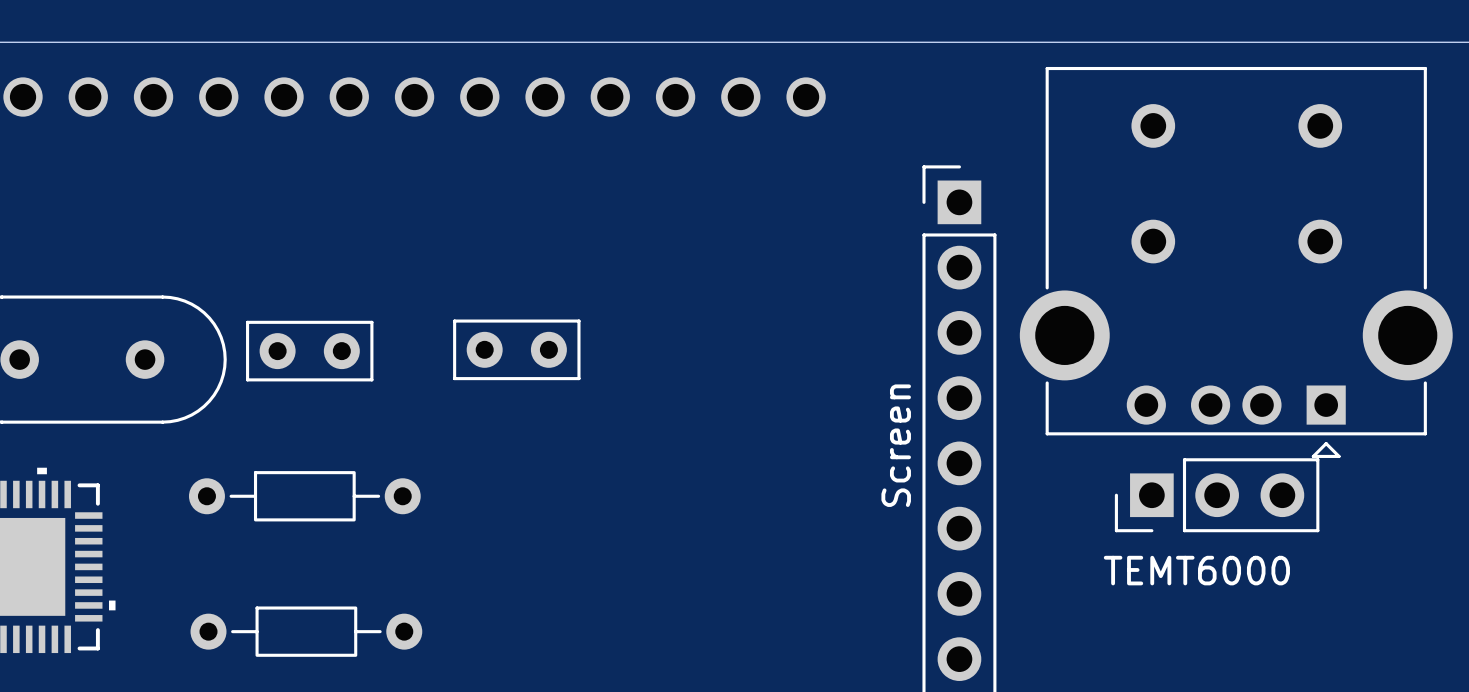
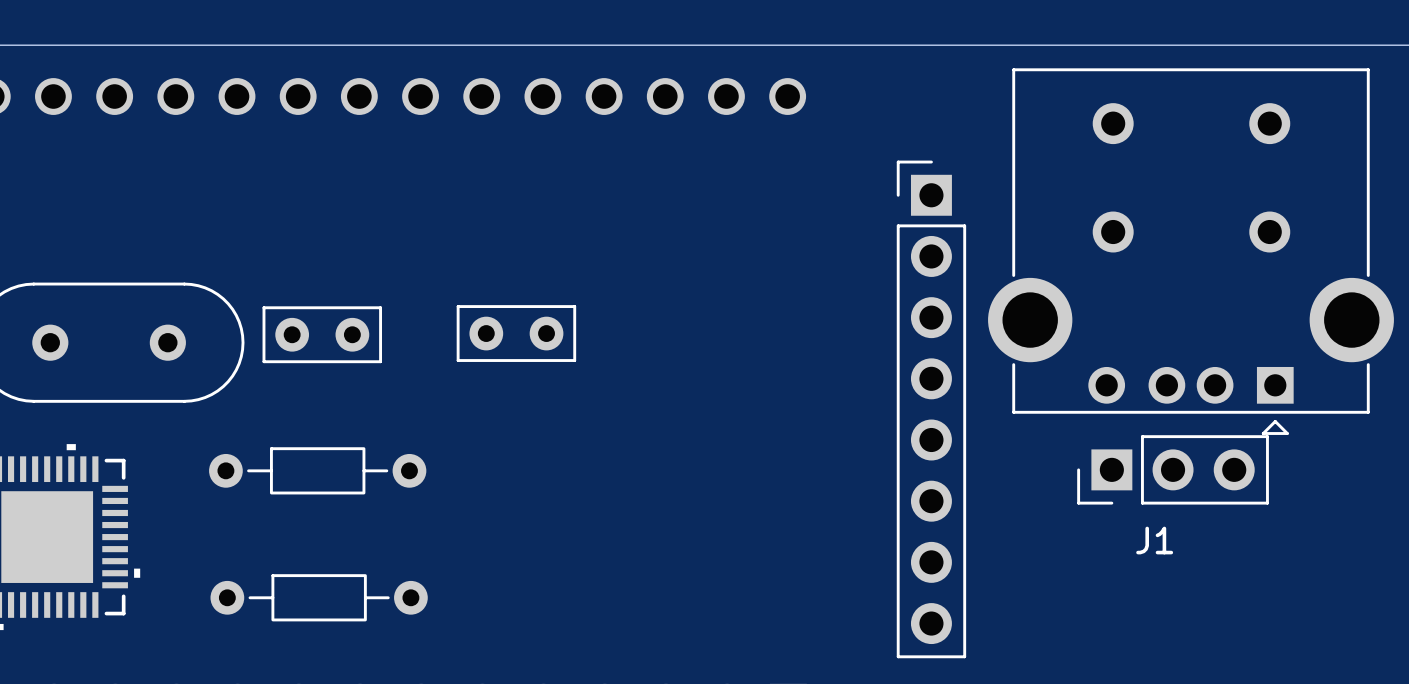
text: Screen (896, 445) -> none
TEMT6000 name: TEMT6000 (1196, 570) -> J1 (1154, 540)

